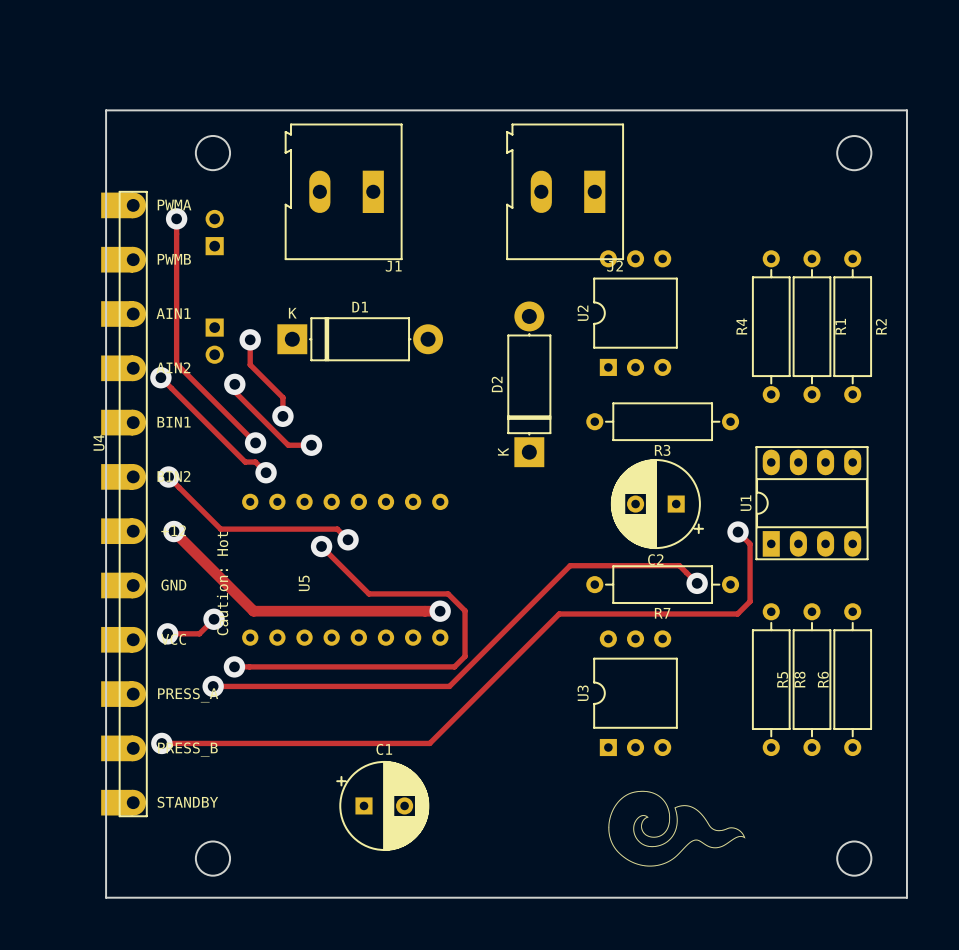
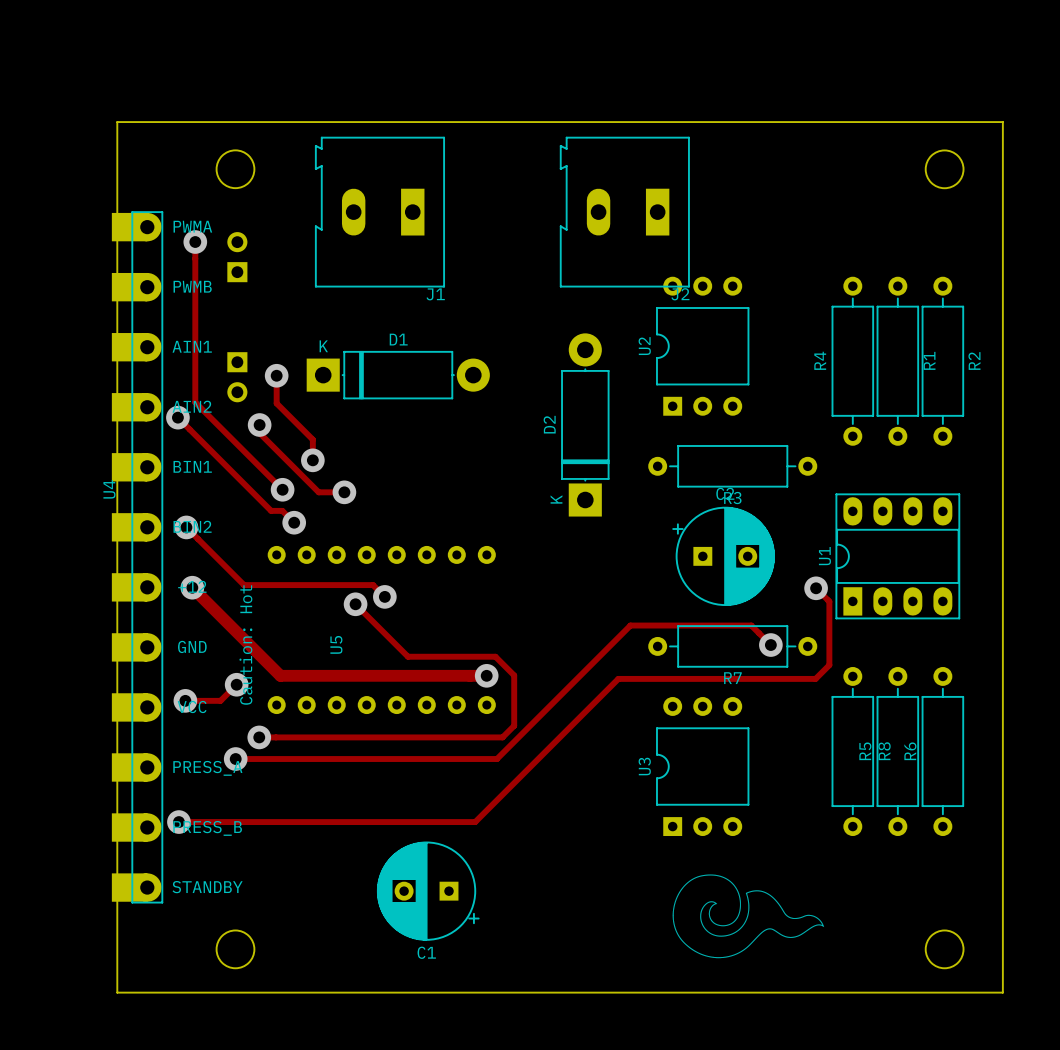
C2 rotation: 0° (657, 504) -> 180° (723, 556)
C1 rotation: 0° (382, 805) -> 180° (428, 891)

